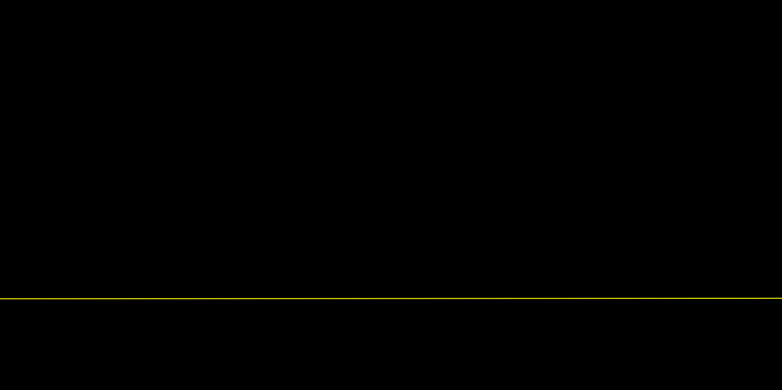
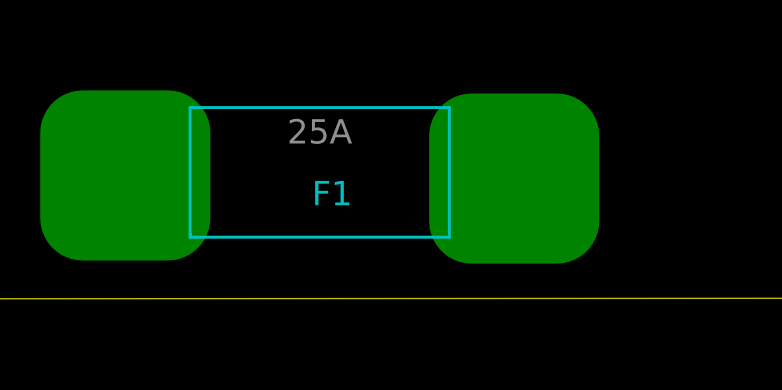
F1: none -> 25A (319, 177)

